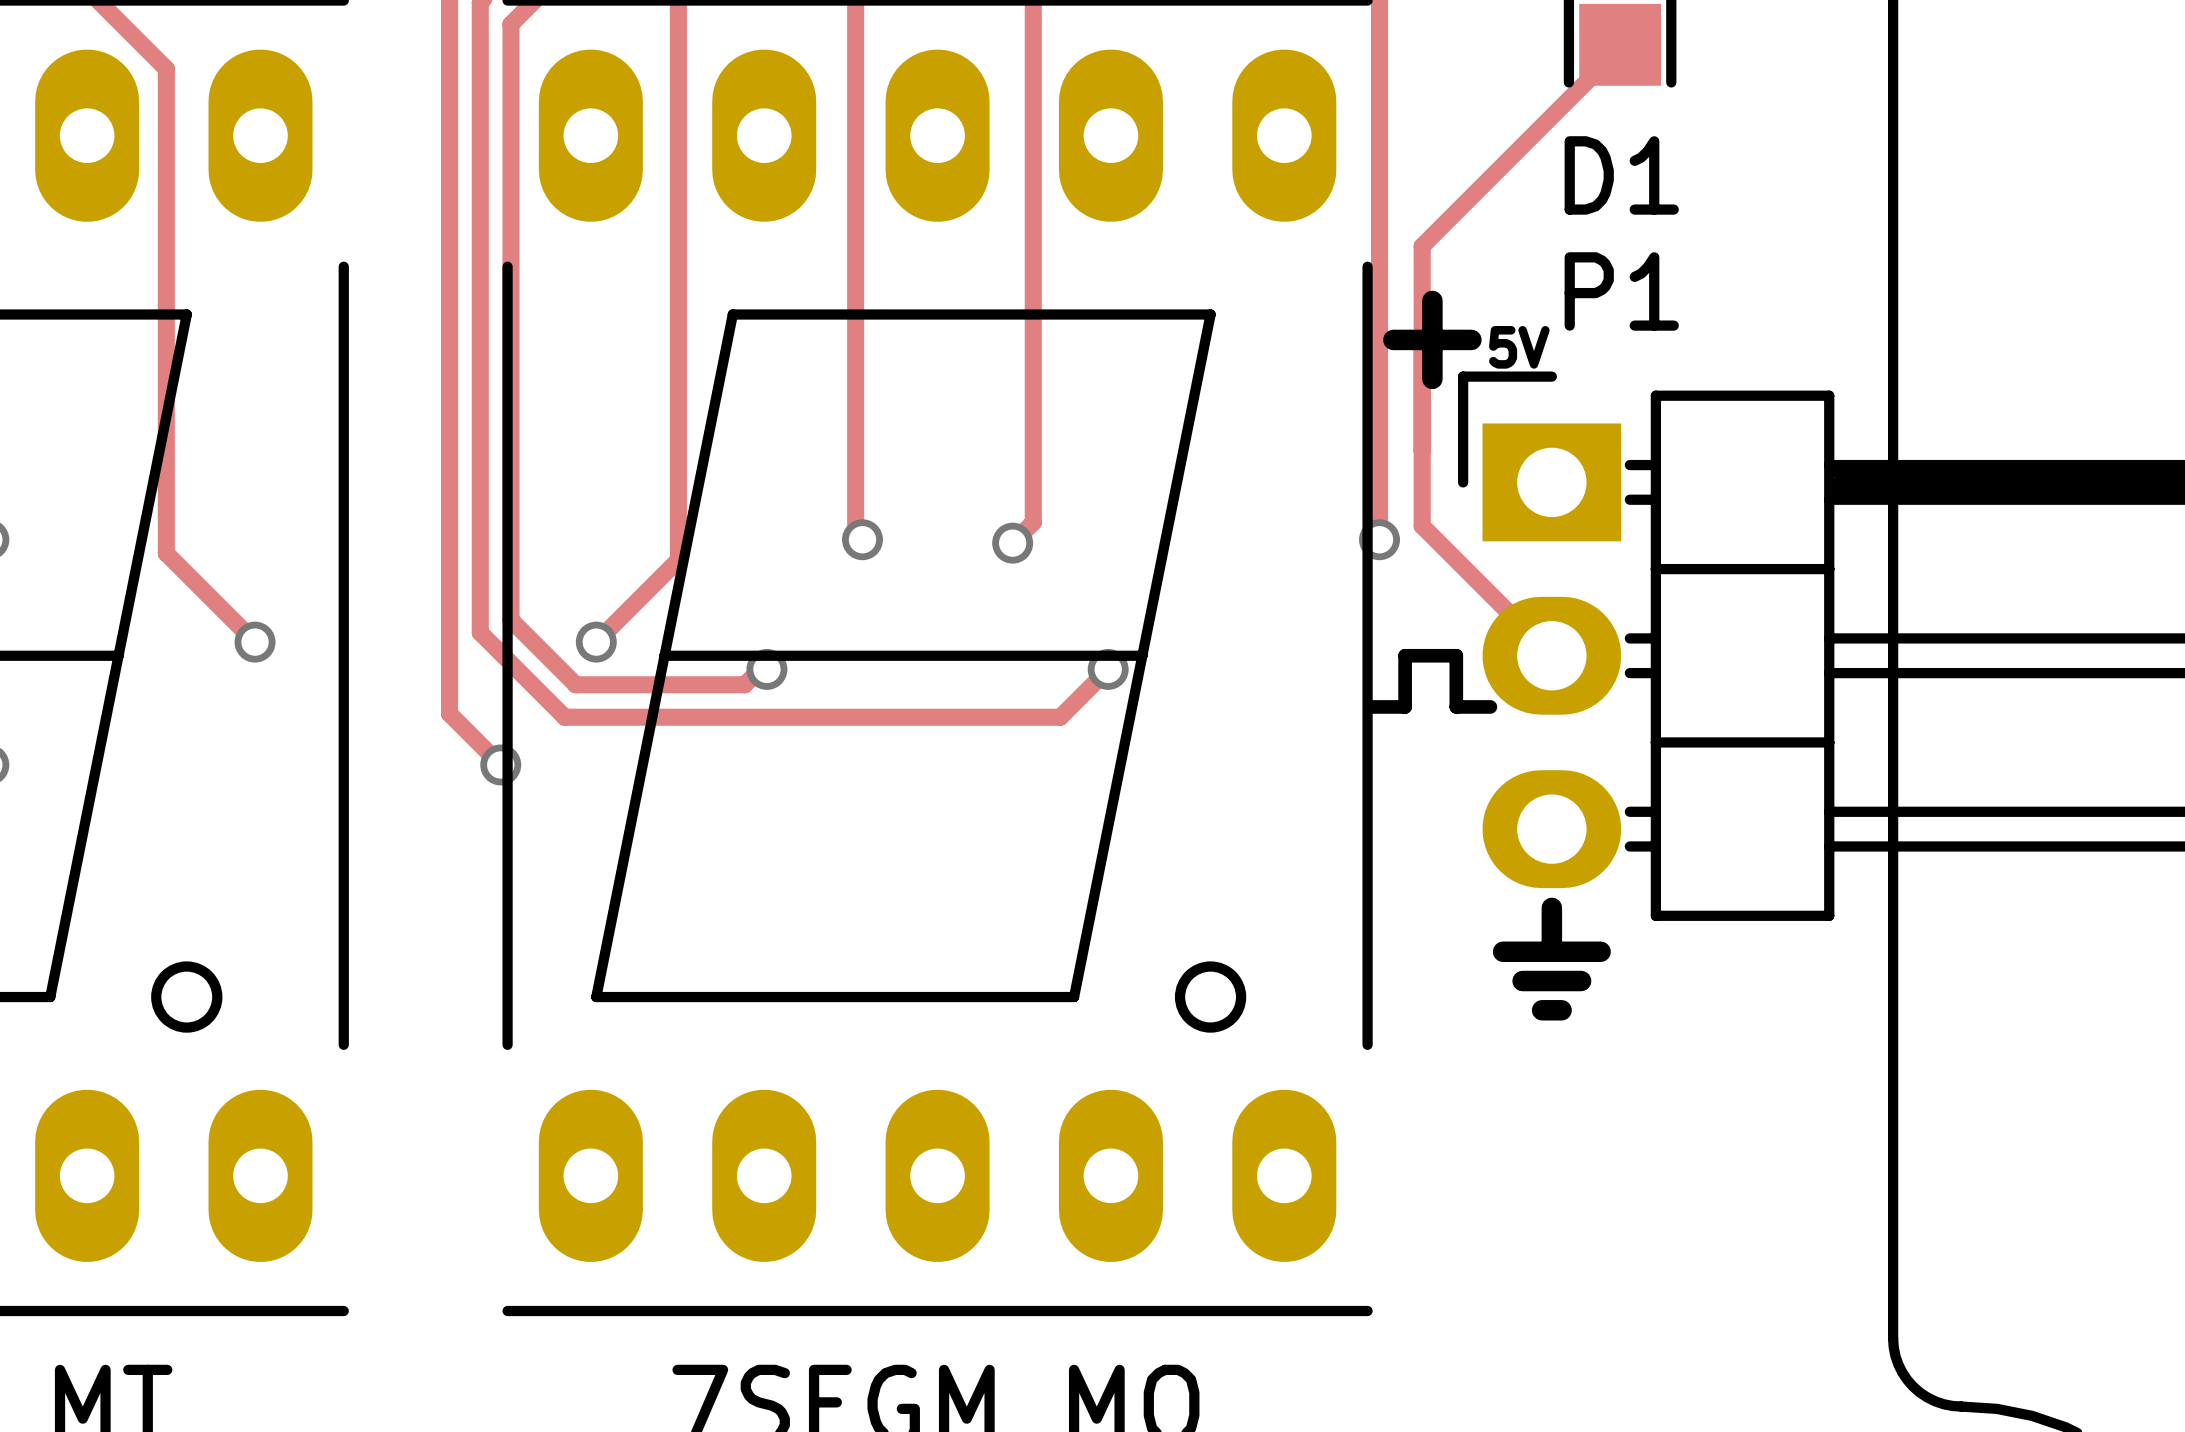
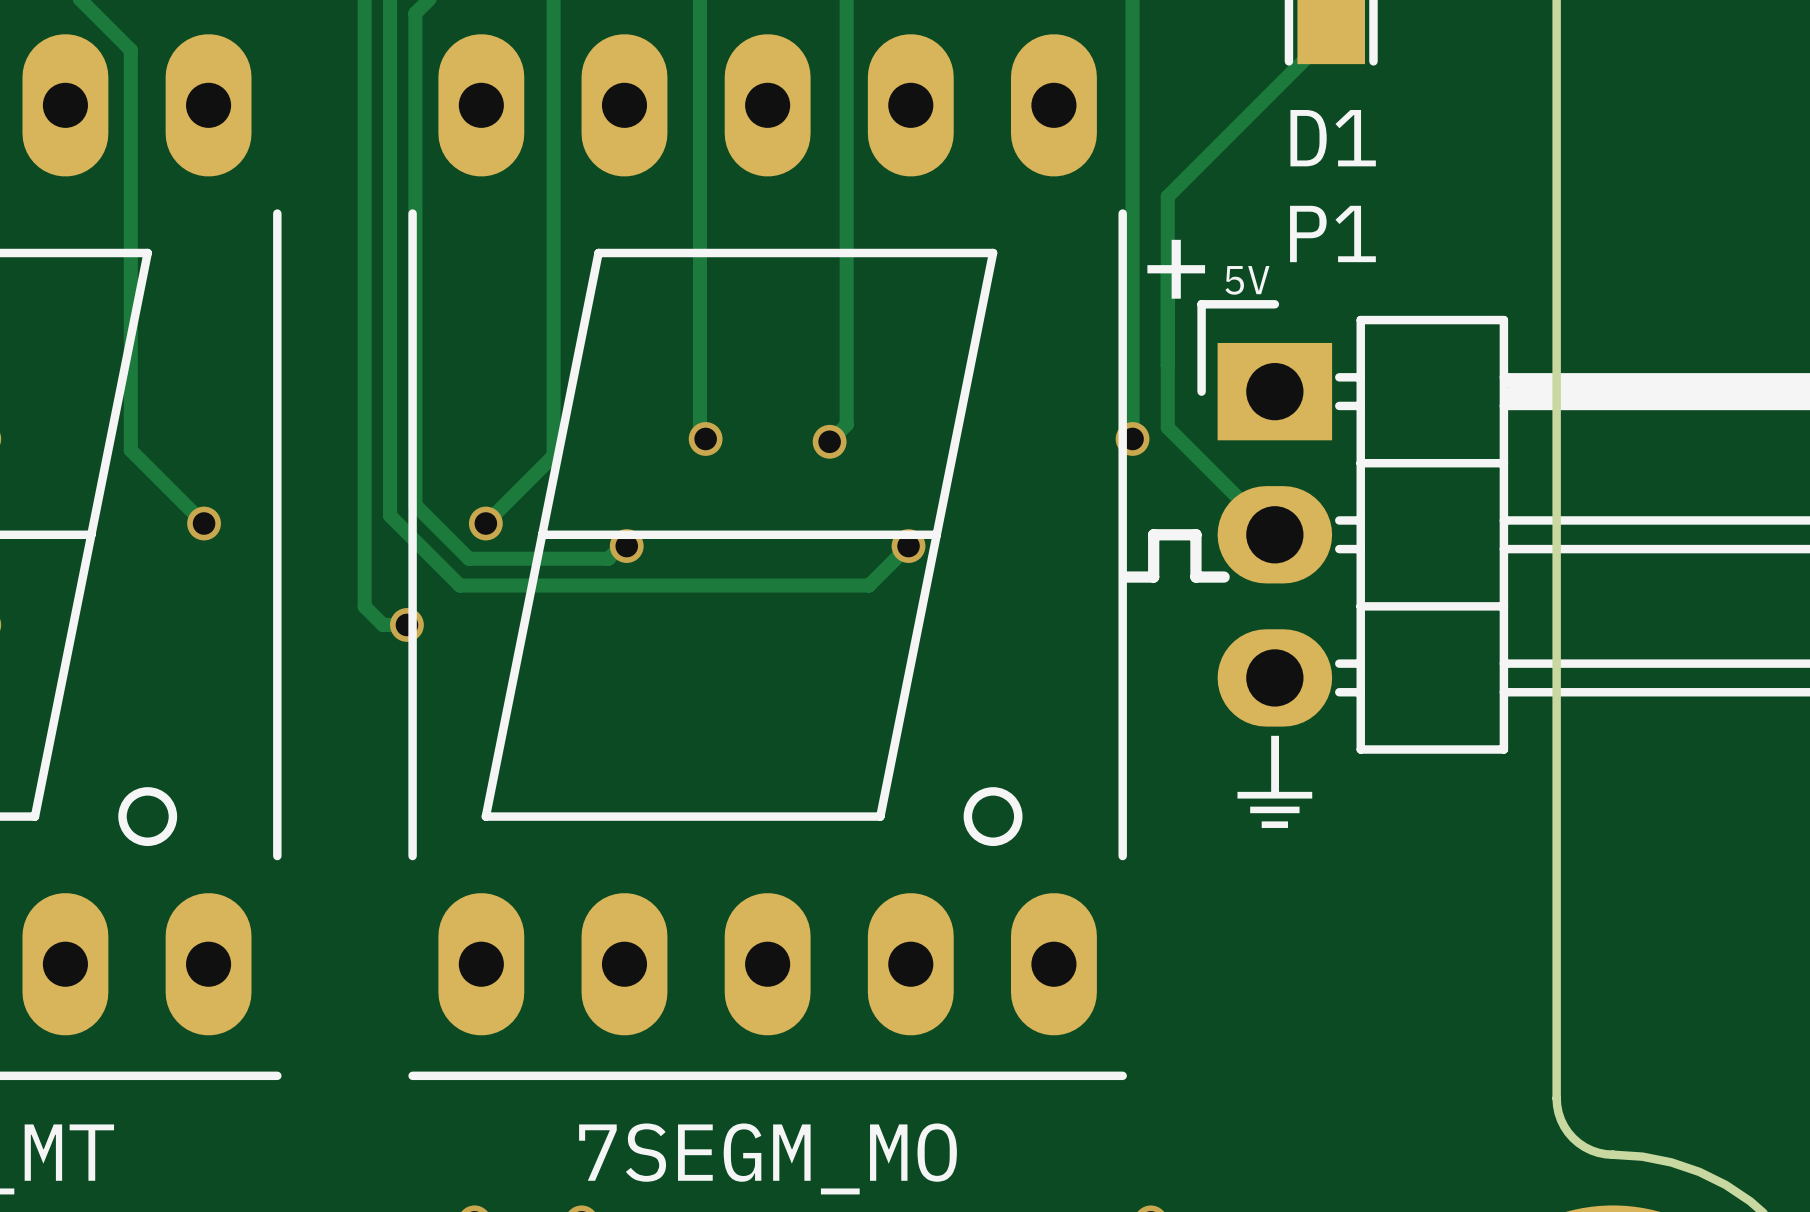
track: (449, 713) (500, 764) -> (364, 582) (364, 606) (383, 624) (406, 624)

